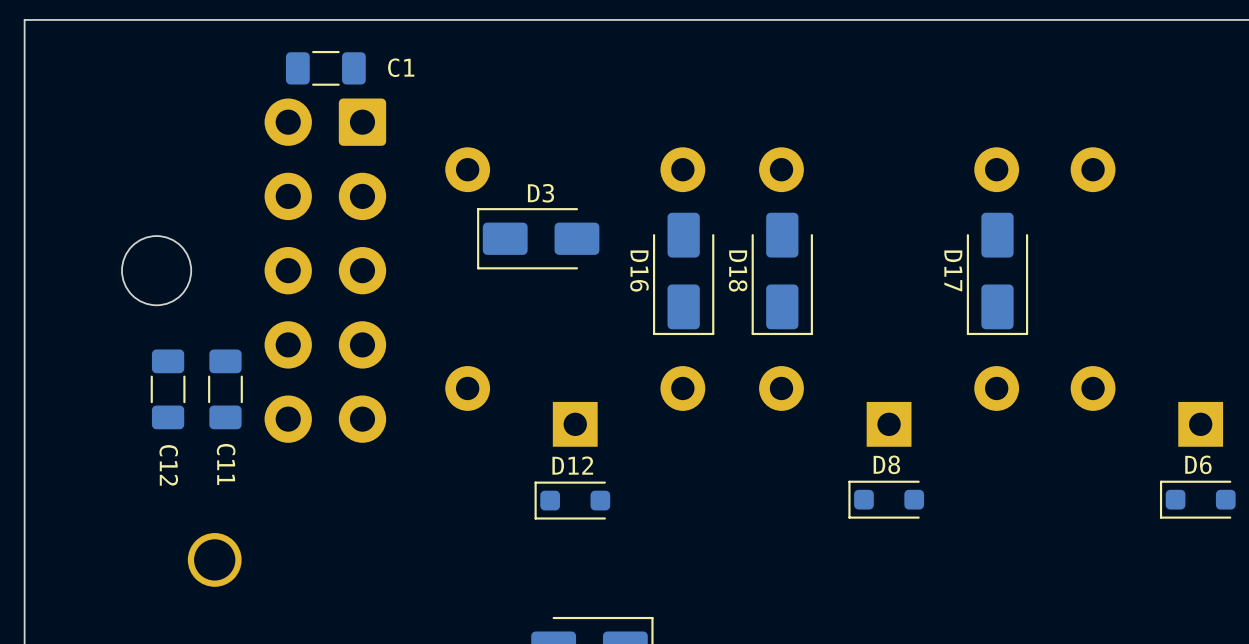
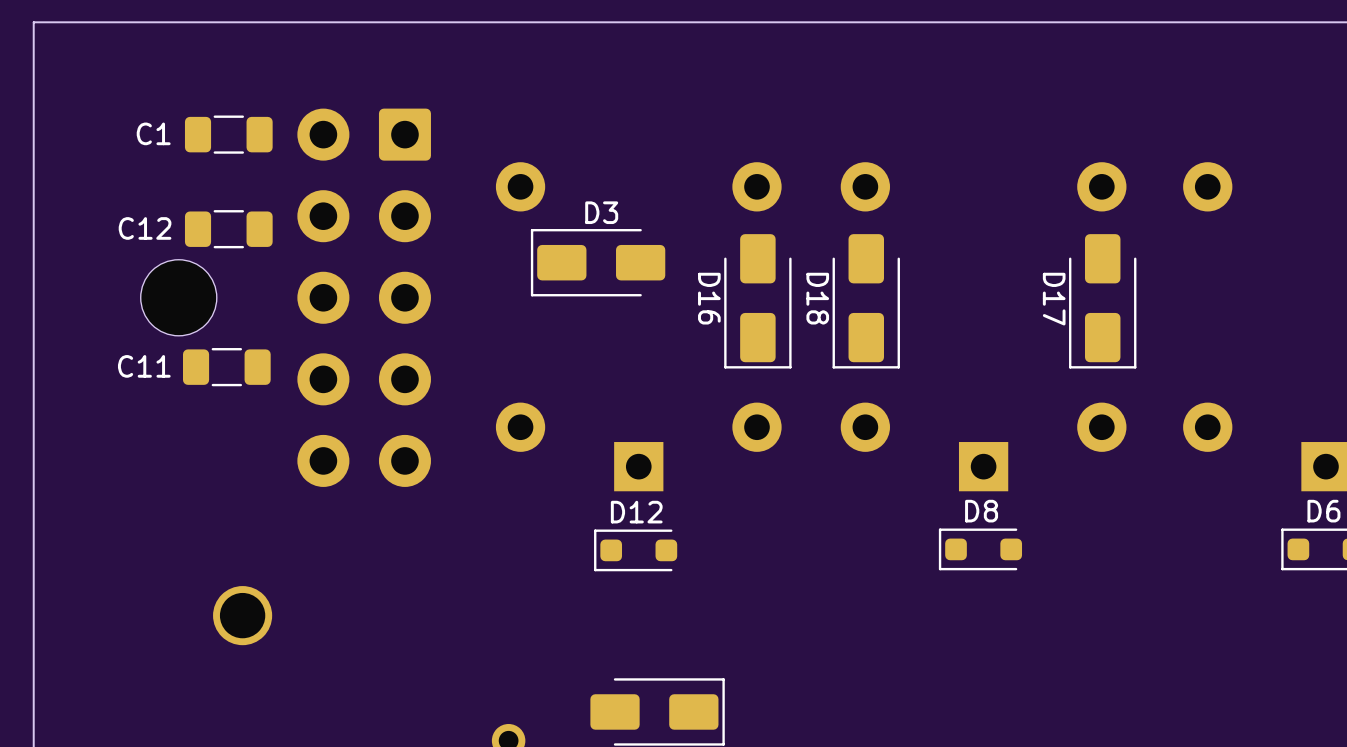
C1 name position: C1 (401, 67) -> C1 (153, 133)
C1 position: (325, 68) -> (228, 134)
C12 rotation: 0° (168, 389) -> 90° clockwise (228, 229)
C12 position: (168, 389) -> (228, 229)
C11 rotation: 0° (225, 389) -> 90° clockwise (226, 367)
C11 position: (225, 389) -> (226, 367)

